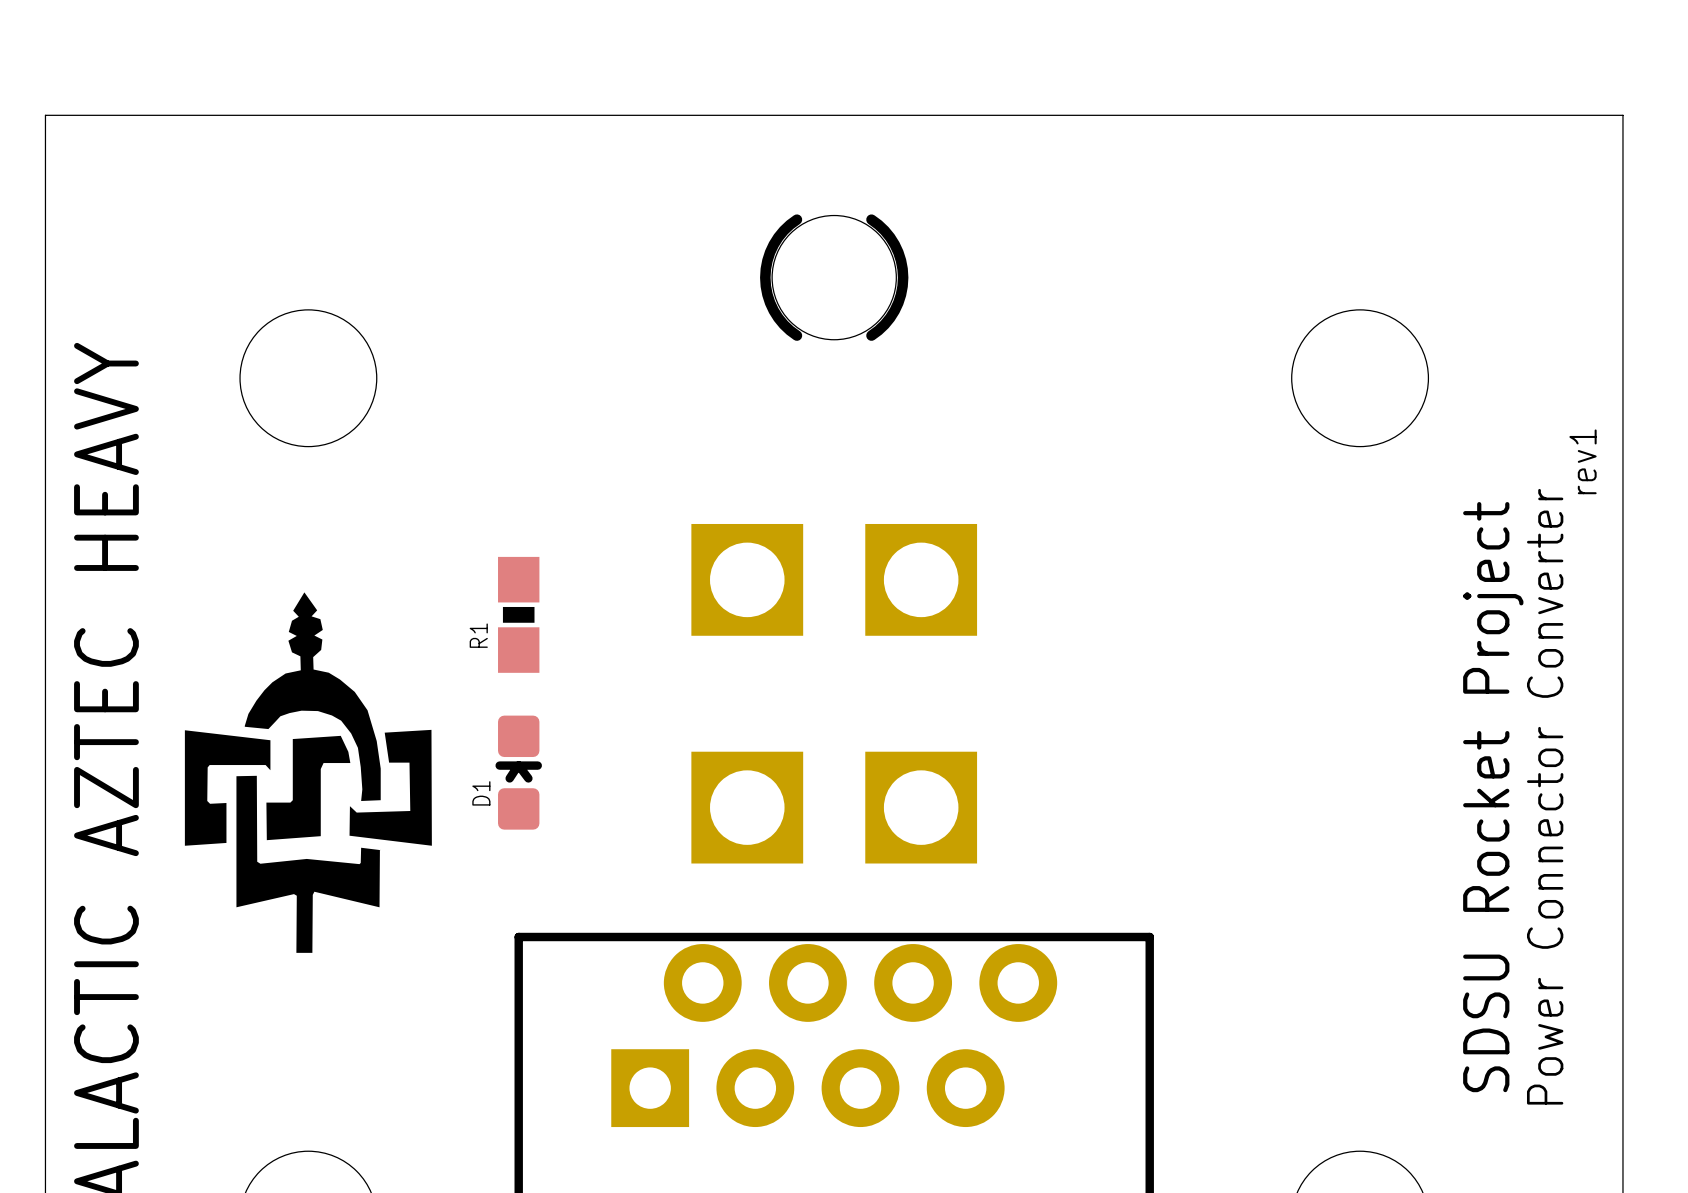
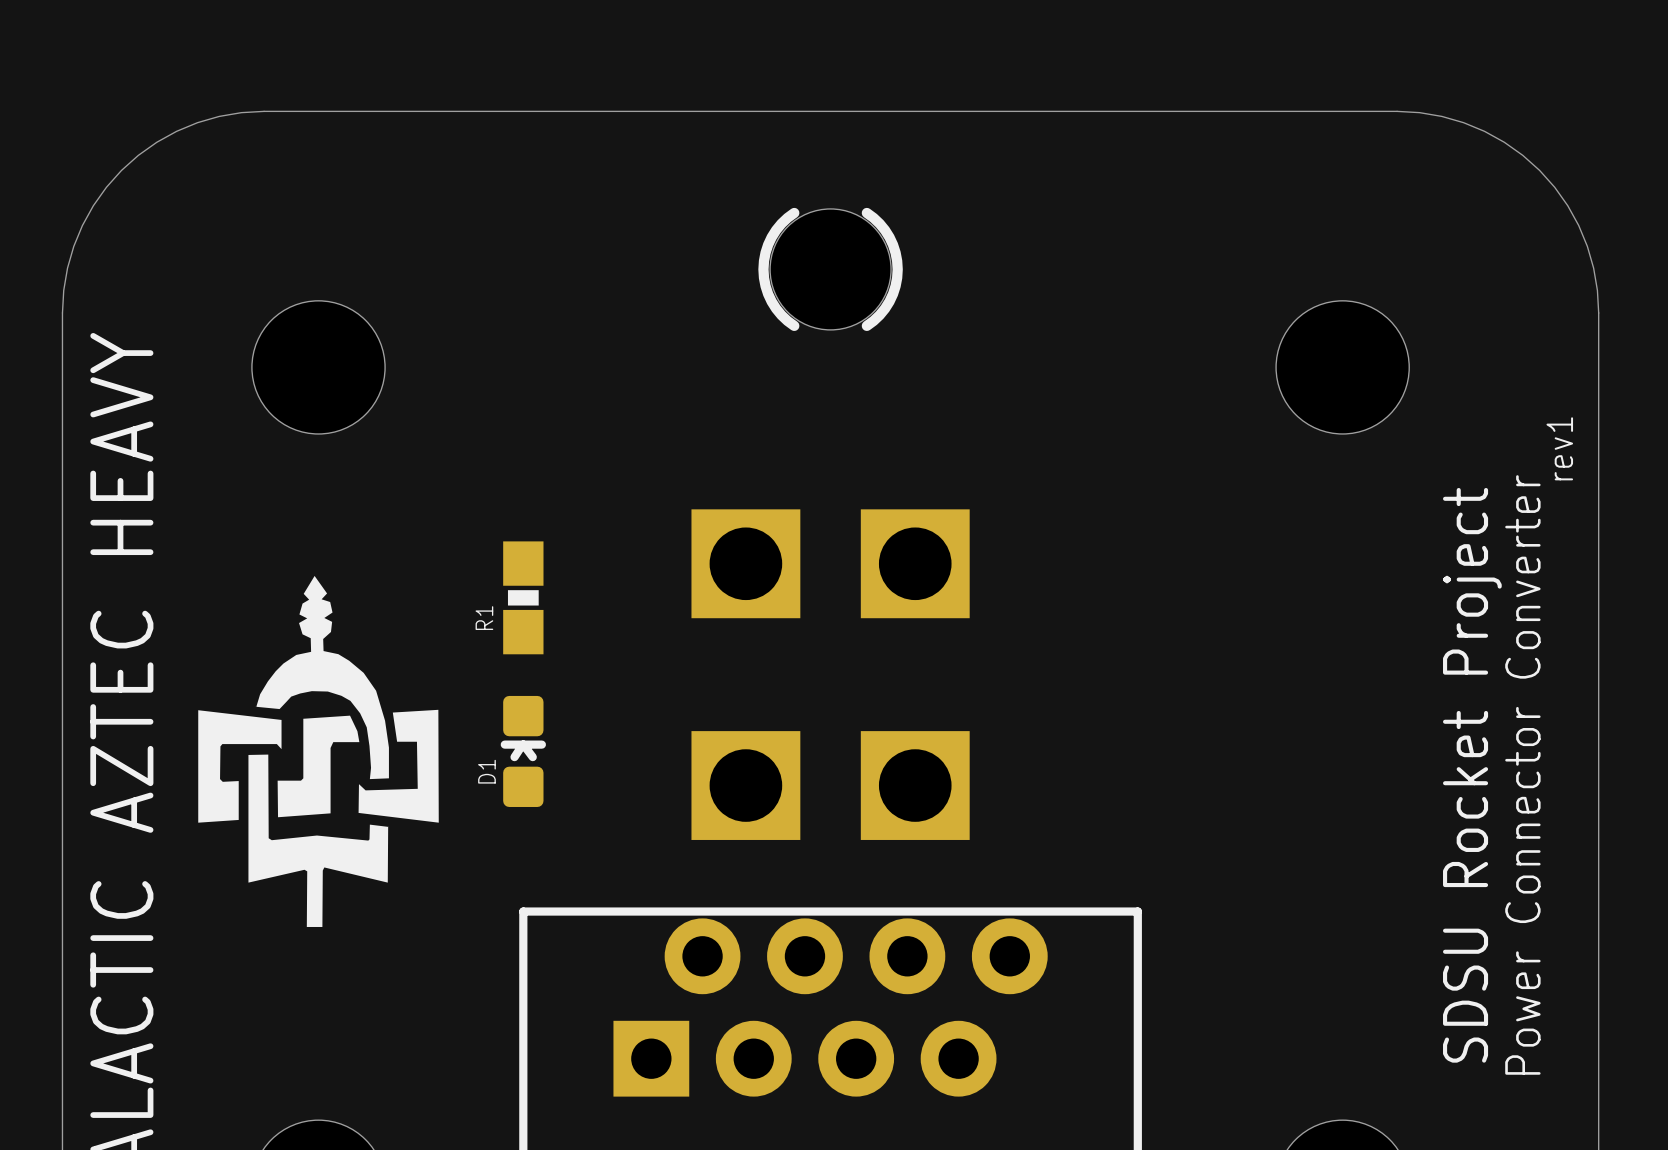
board edge: (252, 115) (45, 115) (45, 322) -> (264, 111) (241, 112) (197, 122) (156, 142) (121, 170) (93, 205) (73, 246) (63, 290) (62, 312)
board edge: (1415, 115) (1622, 115) (1622, 322) -> (1397, 111) (1419, 112) (1463, 122) (1504, 142) (1539, 170) (1567, 205) (1587, 246) (1597, 290) (1598, 312)

